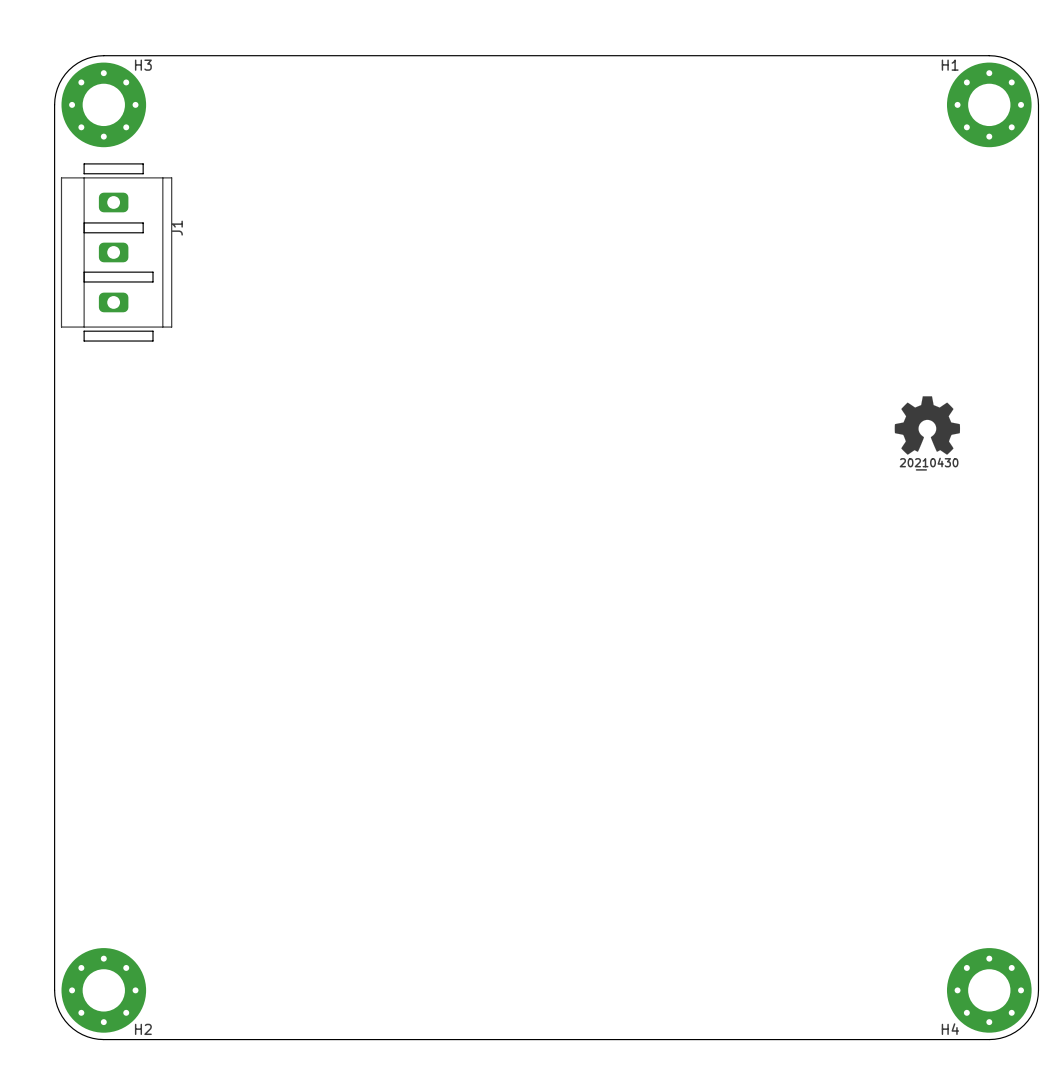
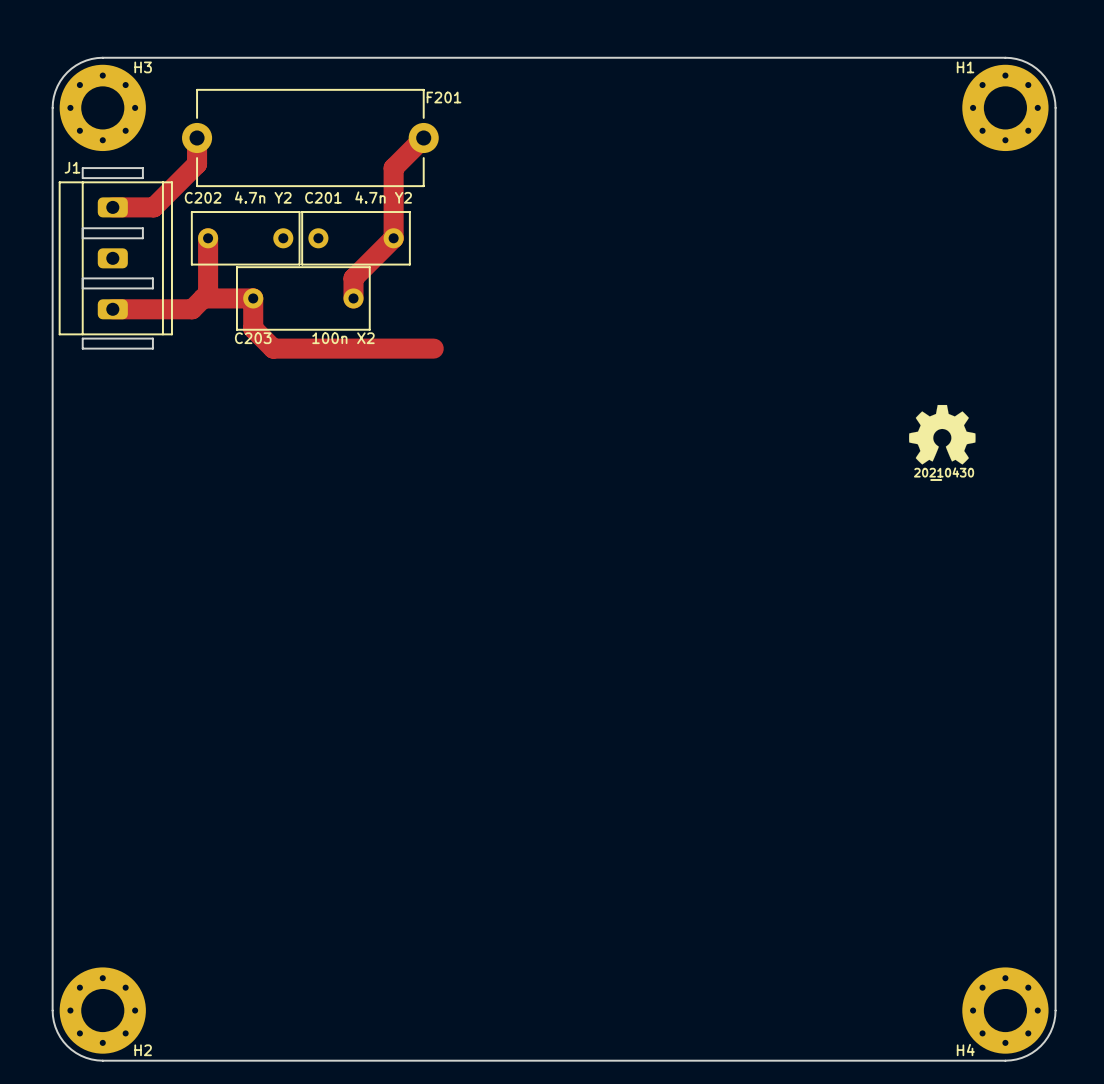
track: none -> (197, 137) (197, 164) (153, 207) (112, 207)
F201: none -> (310, 137)
track: none -> (423, 137) (393, 168) (393, 238) (353, 278) (353, 298)
J1 name rotation: 0° (177, 228) -> 90° clockwise (72, 167)
J1 name position: J1 (177, 228) -> J1 (72, 167)
track: none -> (208, 238) (208, 293) (192, 309) (112, 309)
C202: none -> 4.7n Y2 (245, 238)
C201: none -> 4.7n Y2 (356, 238)
track: none -> (203, 298) (253, 298) (253, 328) (273, 348) (433, 348)
C203: none -> 100n X2 (303, 298)

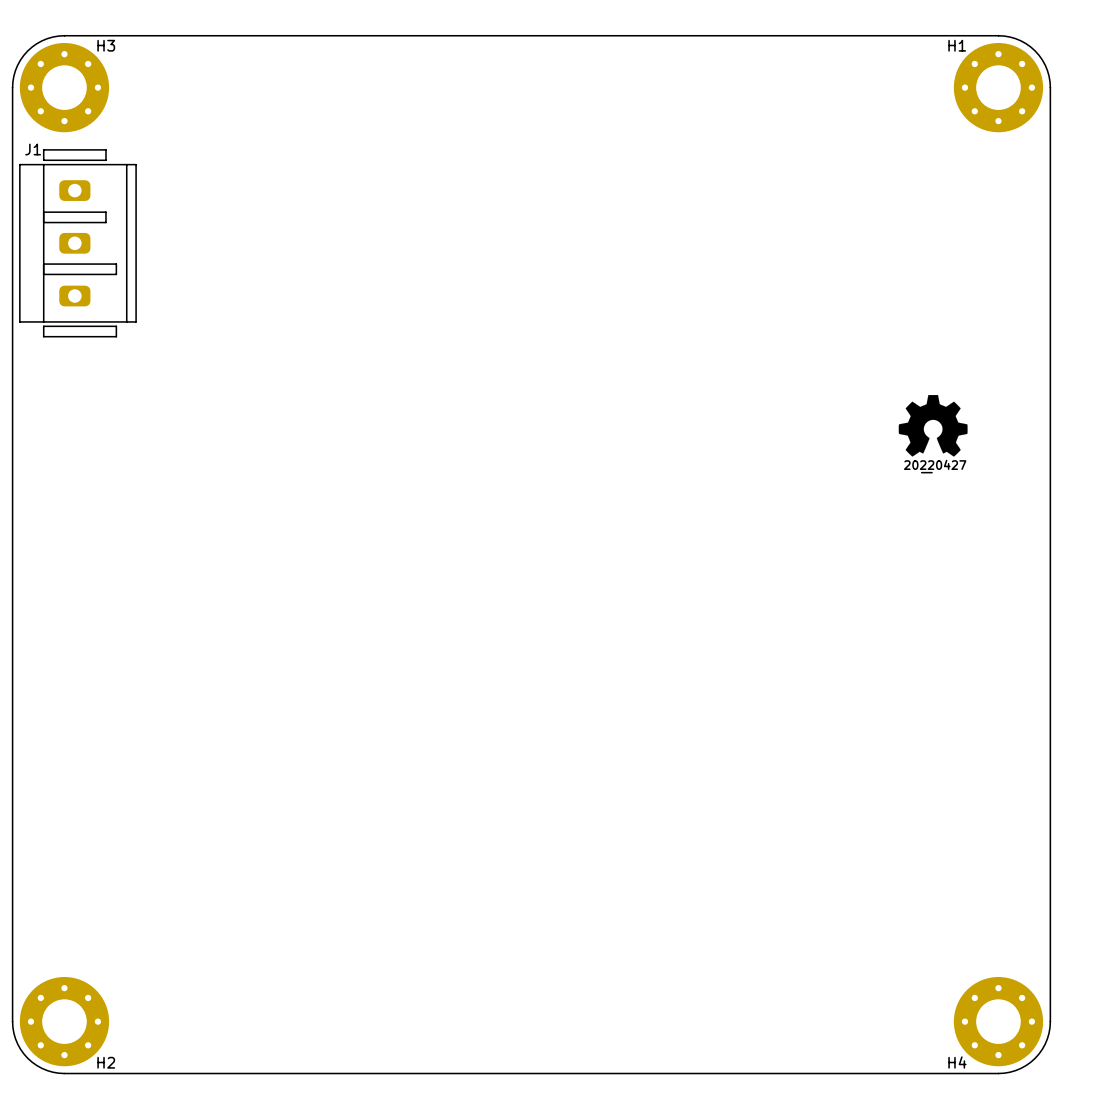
track: (197, 137) (197, 164) (153, 207) (112, 207) -> none
F201: (310, 137) -> none
track: (423, 137) (393, 168) (393, 238) (353, 278) (353, 298) -> none
track: (208, 238) (208, 293) (192, 309) (112, 309) -> none
C202: 4.7n Y2 (245, 238) -> none
C201: 4.7n Y2 (356, 238) -> none
track: (203, 298) (253, 298) (253, 328) (273, 348) (433, 348) -> none
C203: 100n X2 (303, 298) -> none
drawing shape: [914, 467, 975, 481] -> [903, 459, 967, 474]

